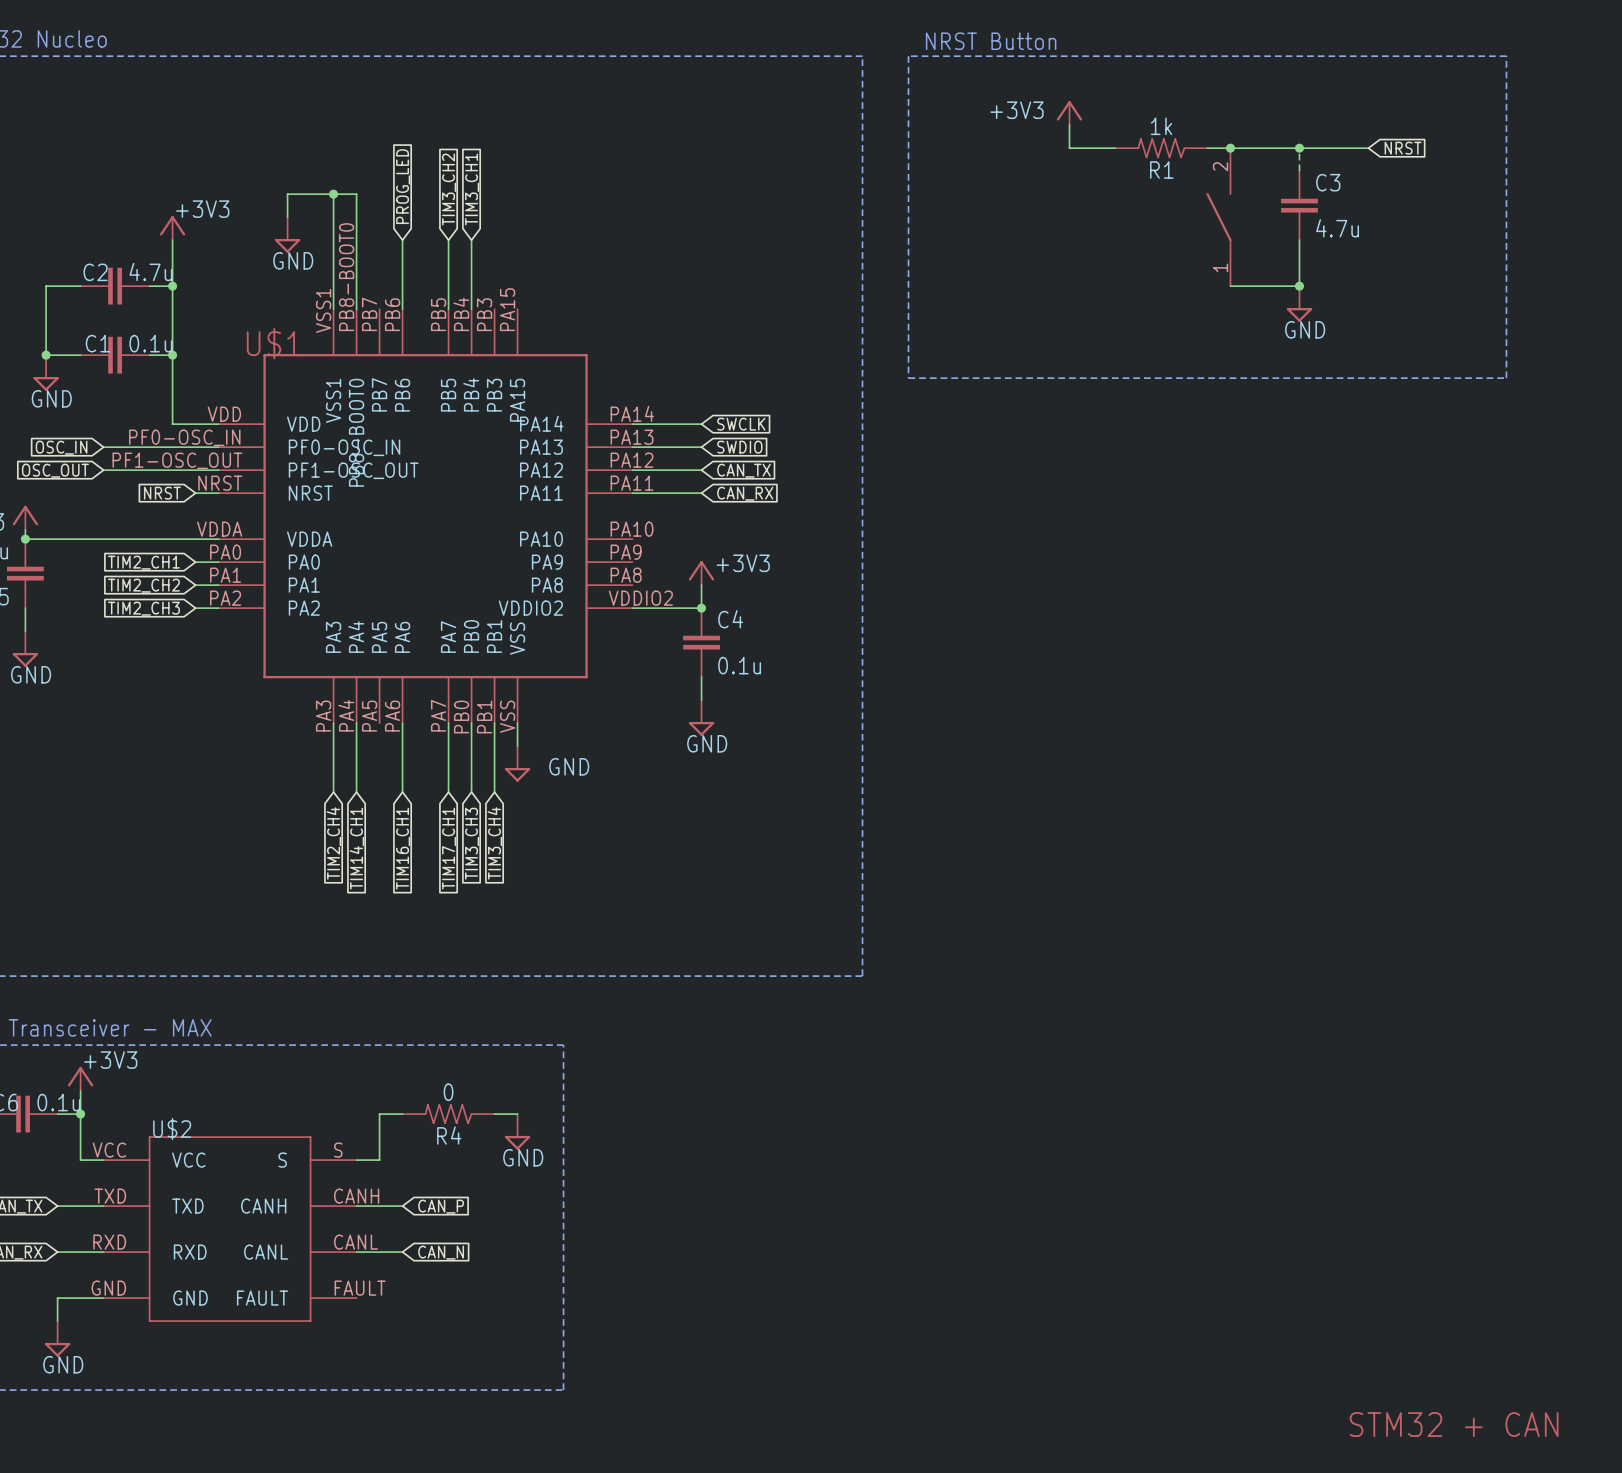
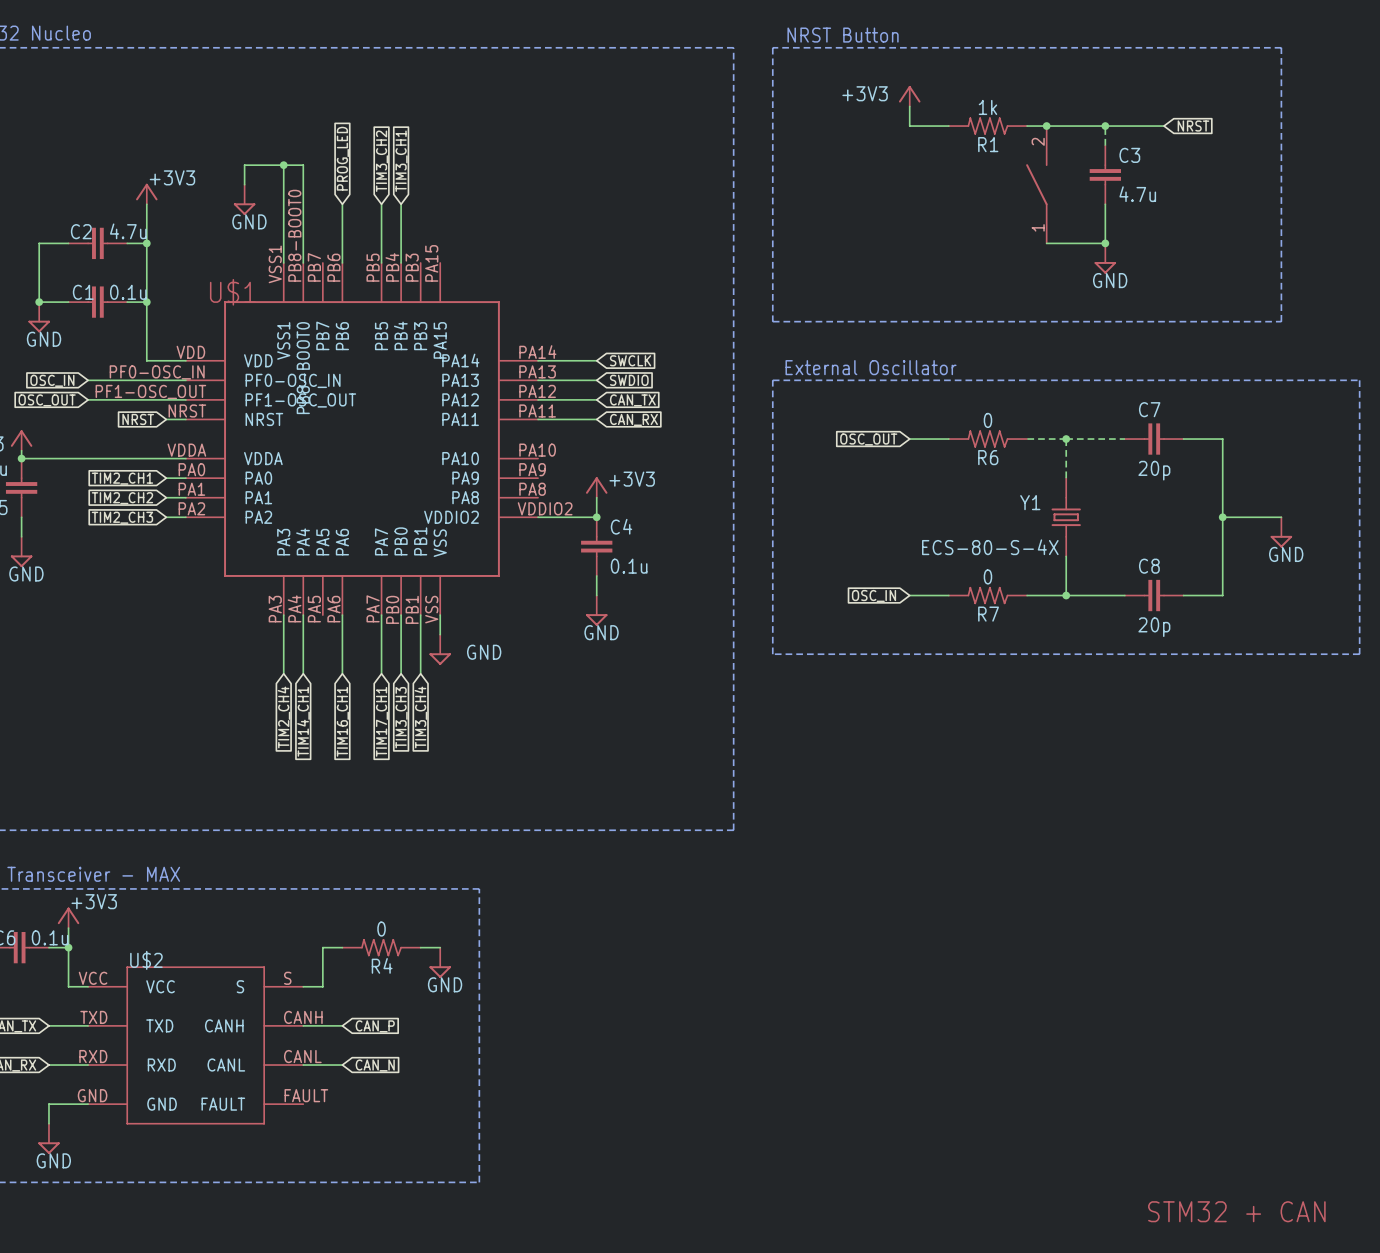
text: none -> External Oscillator (871, 367)
line: none -> (772, 380) (1359, 380) (1359, 654) (772, 654) (772, 380)
global label: none -> OSC_OUT (868, 439)
wire: none -> (909, 439) (948, 439)
R6: none -> 0 (987, 439)
wire: none -> (1027, 439) (1124, 439)
wire: none -> (1066, 439) (1066, 478)
junction: none -> (1066, 439)
C7: none -> 20p (1154, 439)
wire: none -> (1183, 439) (1222, 439) (1222, 595) (1183, 595)
Y1: none -> ECS-80-S-4X (1066, 517)
wire: none -> (1222, 517) (1281, 517)
junction: none -> (1222, 517)
power symbol: none -> GND (1281, 532)
wire: none -> (1066, 556) (1066, 595)
global label: none -> OSC_IN (873, 595)
wire: none -> (909, 595) (948, 595)
R7: none -> 0 (987, 595)
wire: none -> (1027, 595) (1124, 595)
junction: none -> (1066, 595)
C8: none -> 20p (1154, 595)

